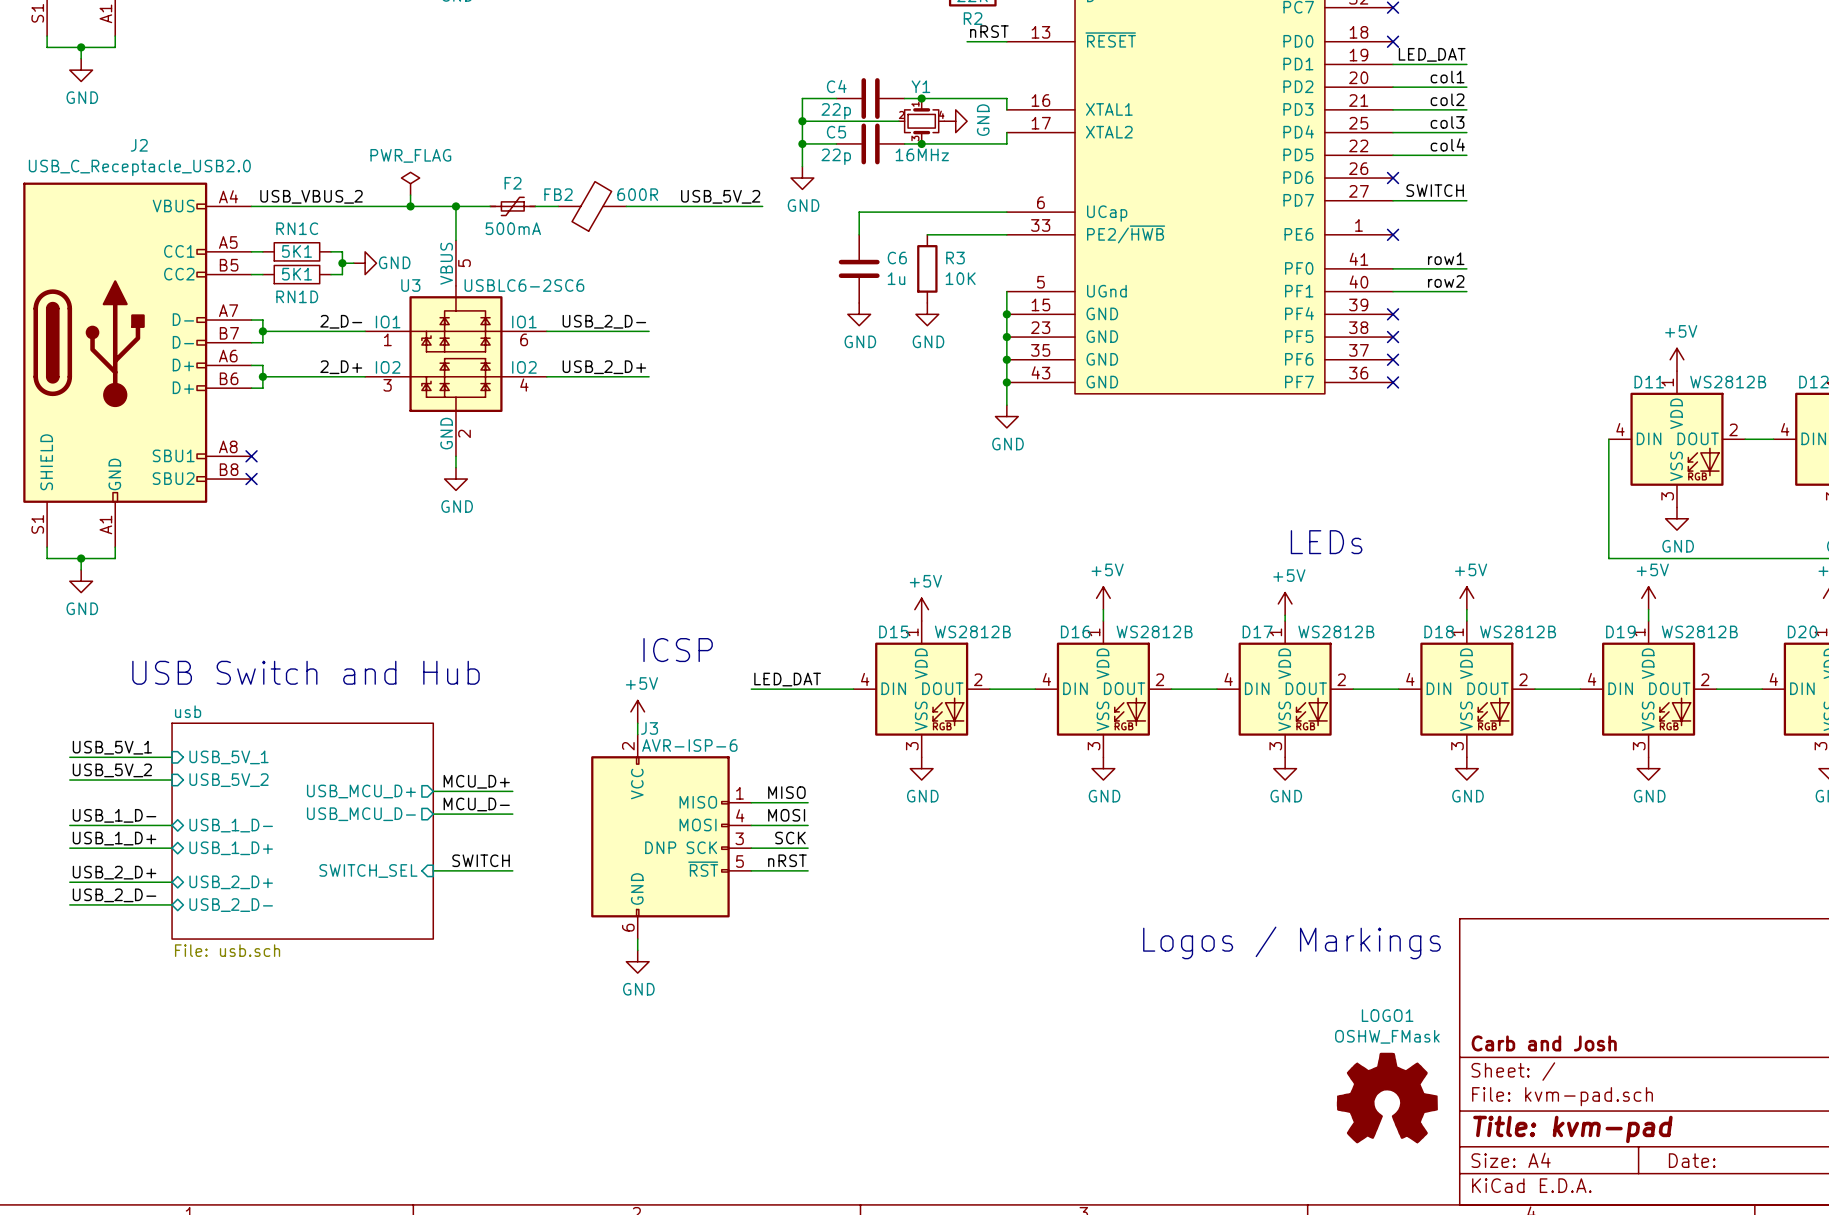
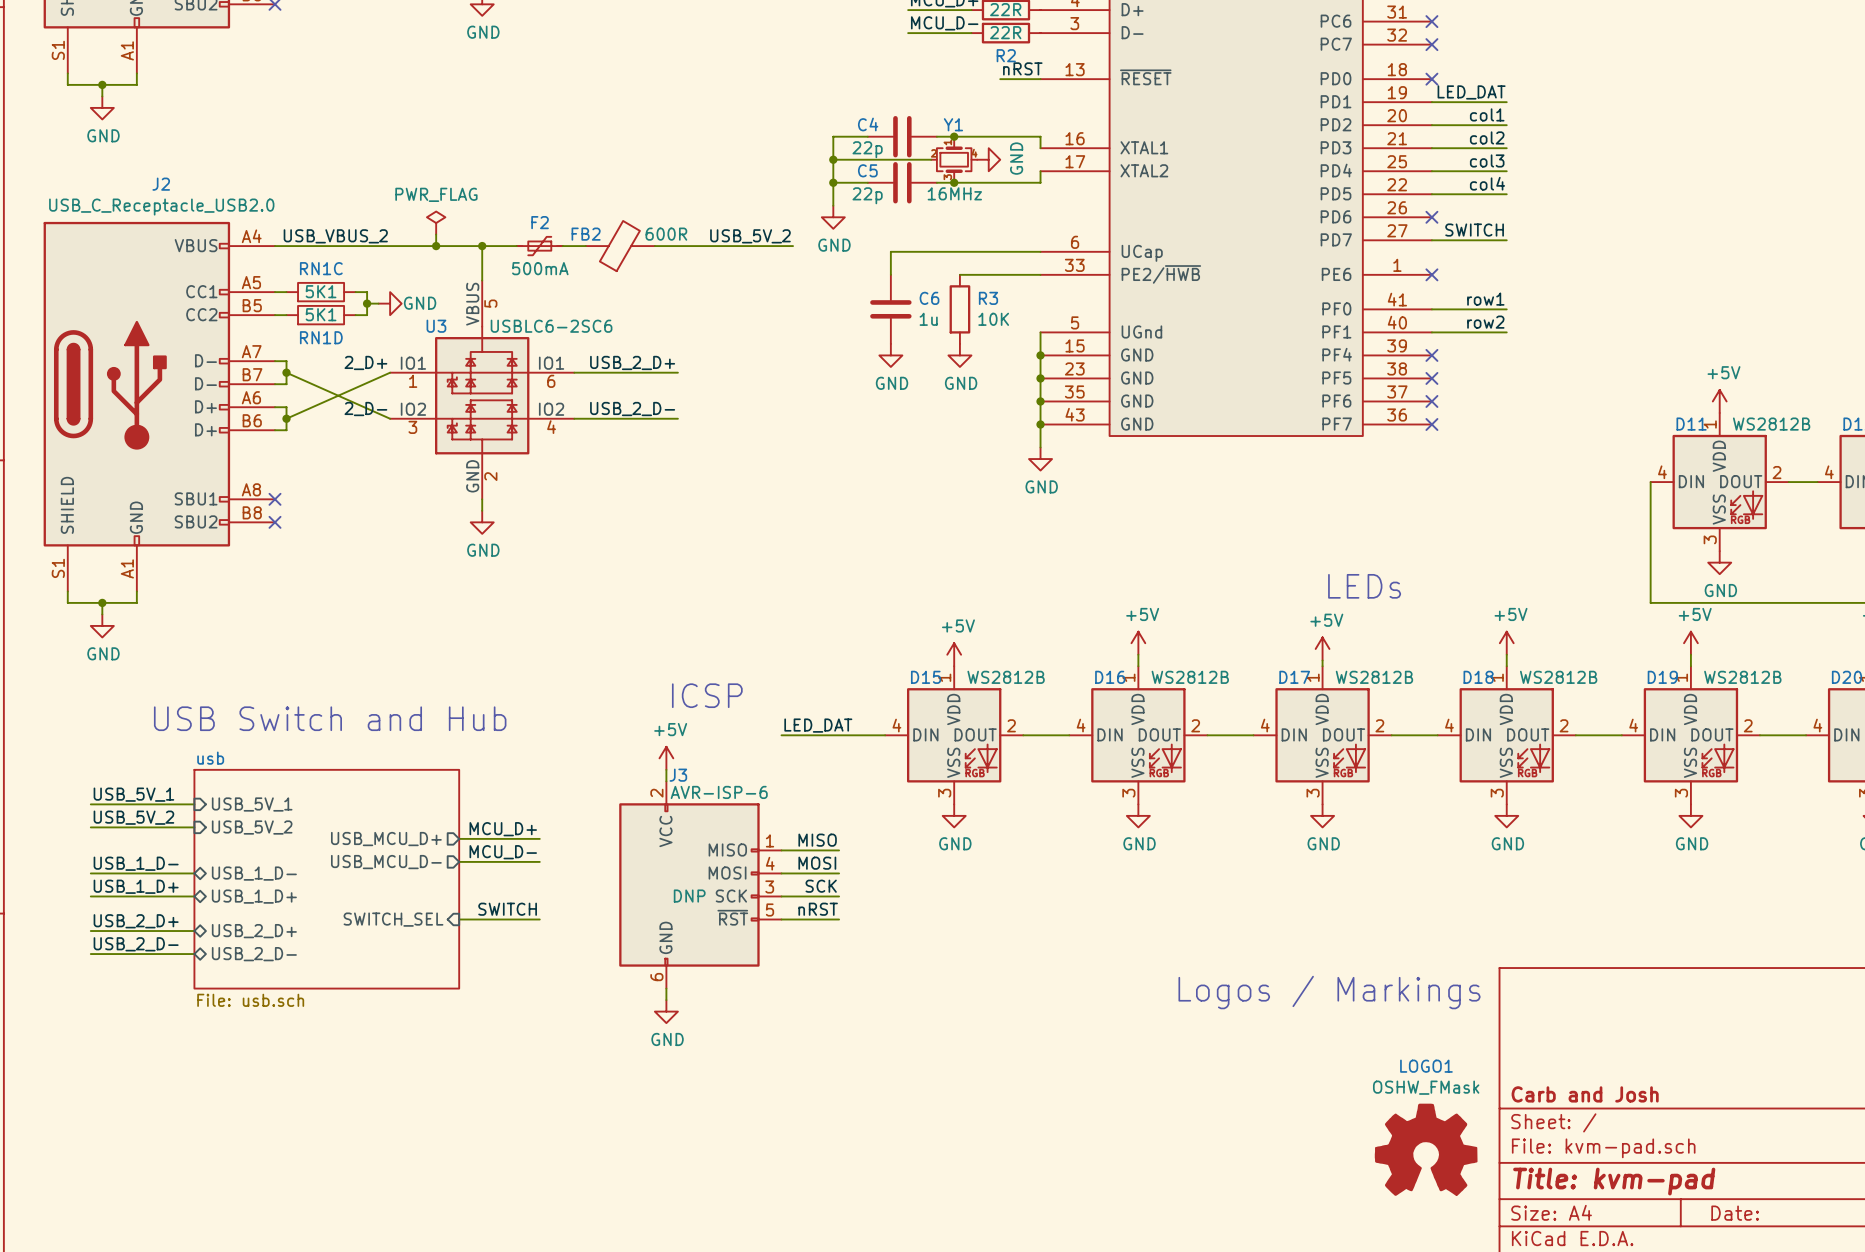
label: 2_D- (341, 321) -> 2_D+ (365, 362)
label: USB_2_D- (604, 321) -> USB_2_D+ (632, 362)
wire: (262, 331) (365, 331) -> (286, 372) (390, 418)
label: 2_D+ (341, 367) -> 2_D- (365, 409)
label: USB_2_D+ (604, 367) -> USB_2_D- (632, 409)
wire: (262, 376) (365, 376) -> (286, 418) (390, 372)

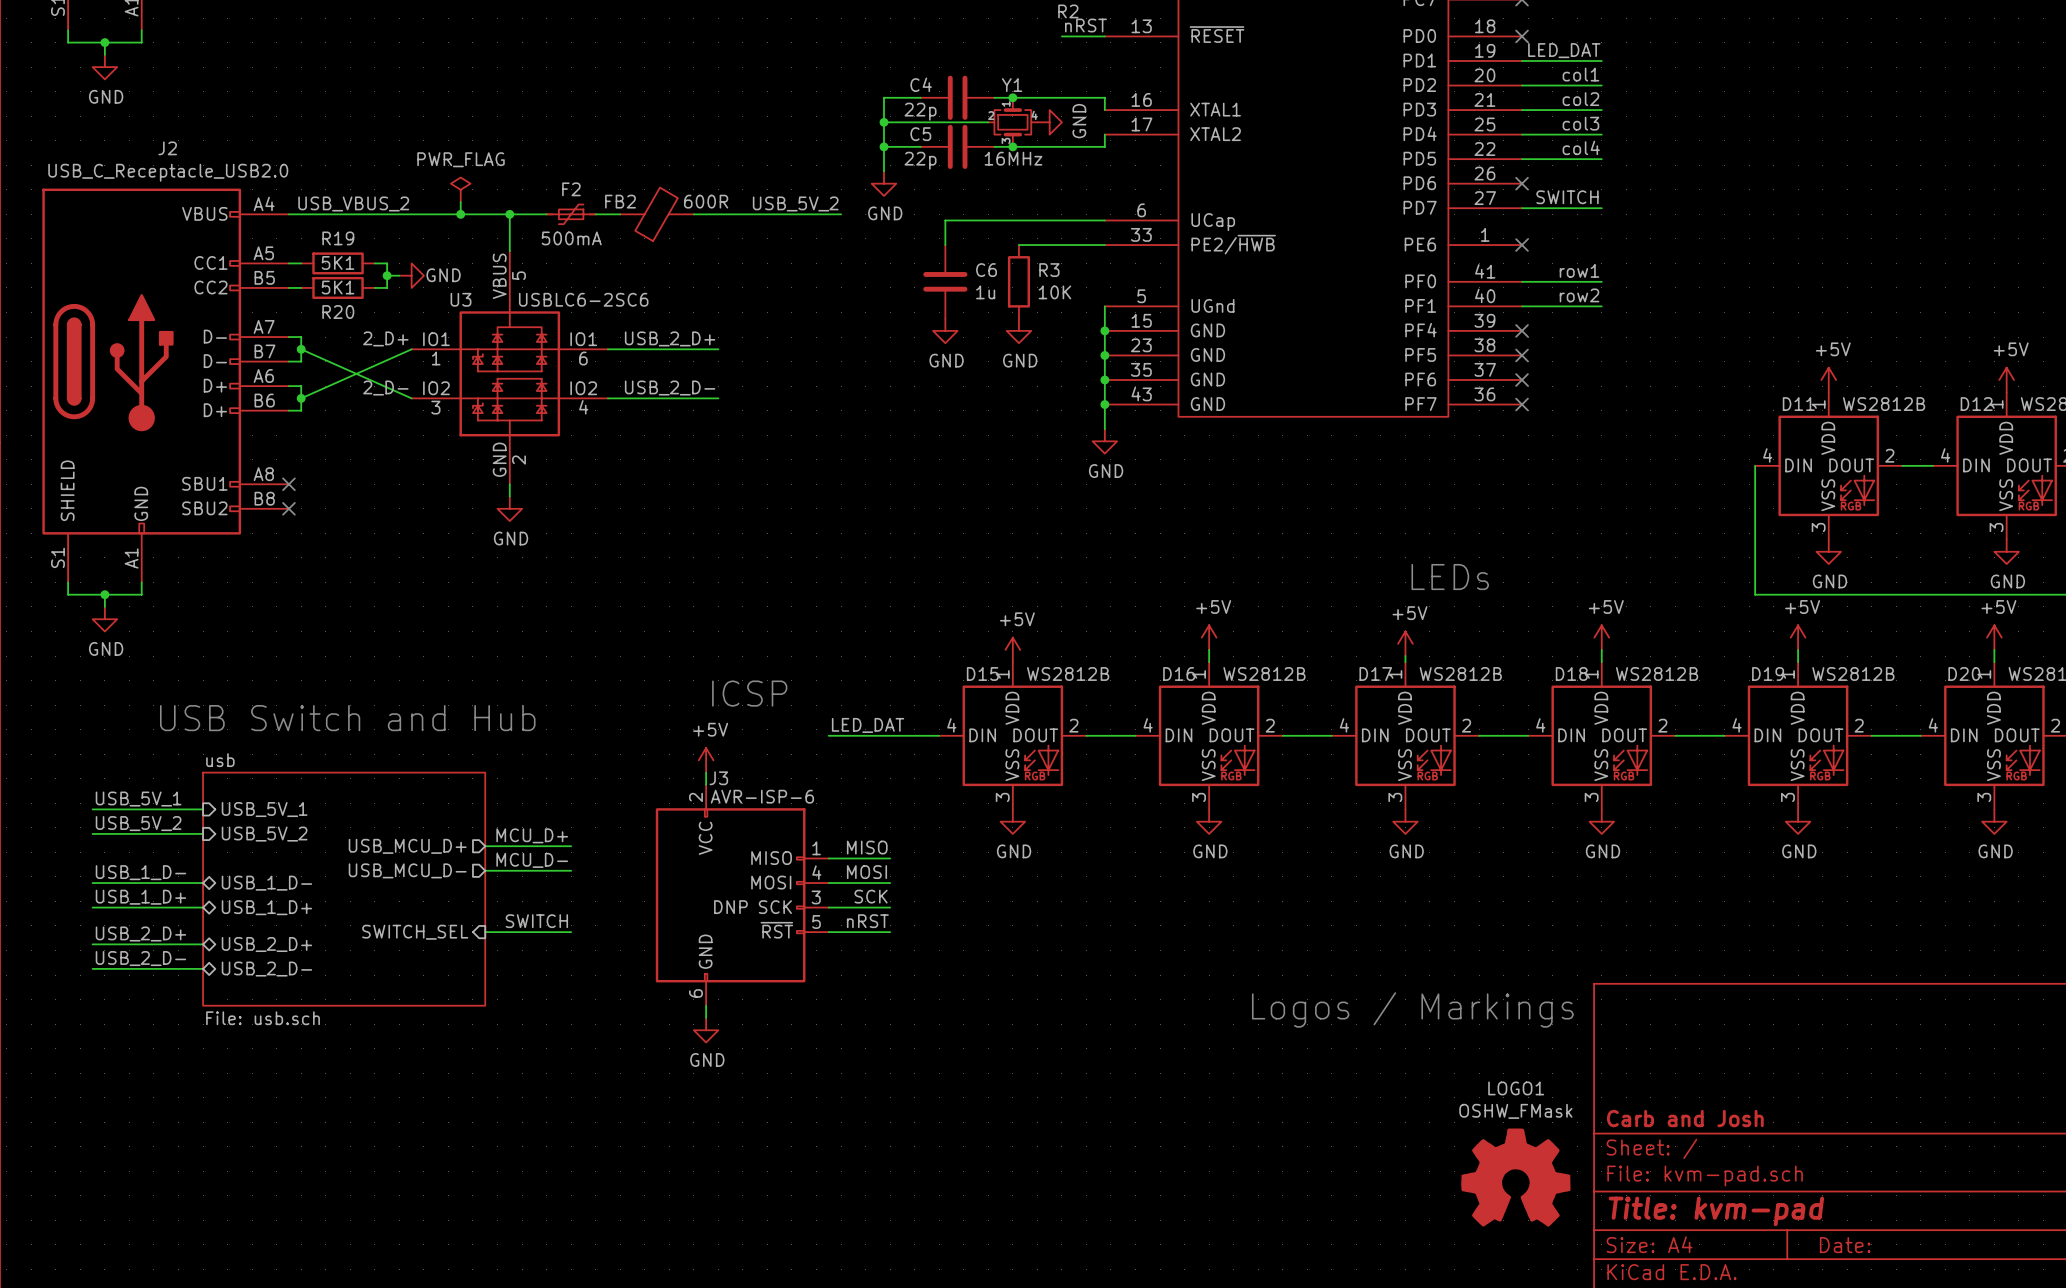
RN1C: 5K1 (321, 292) -> none
R19: none -> 5K1 (338, 263)
RN1D: 5K1 (321, 315) -> none
R20: none -> 5K1 (338, 287)

